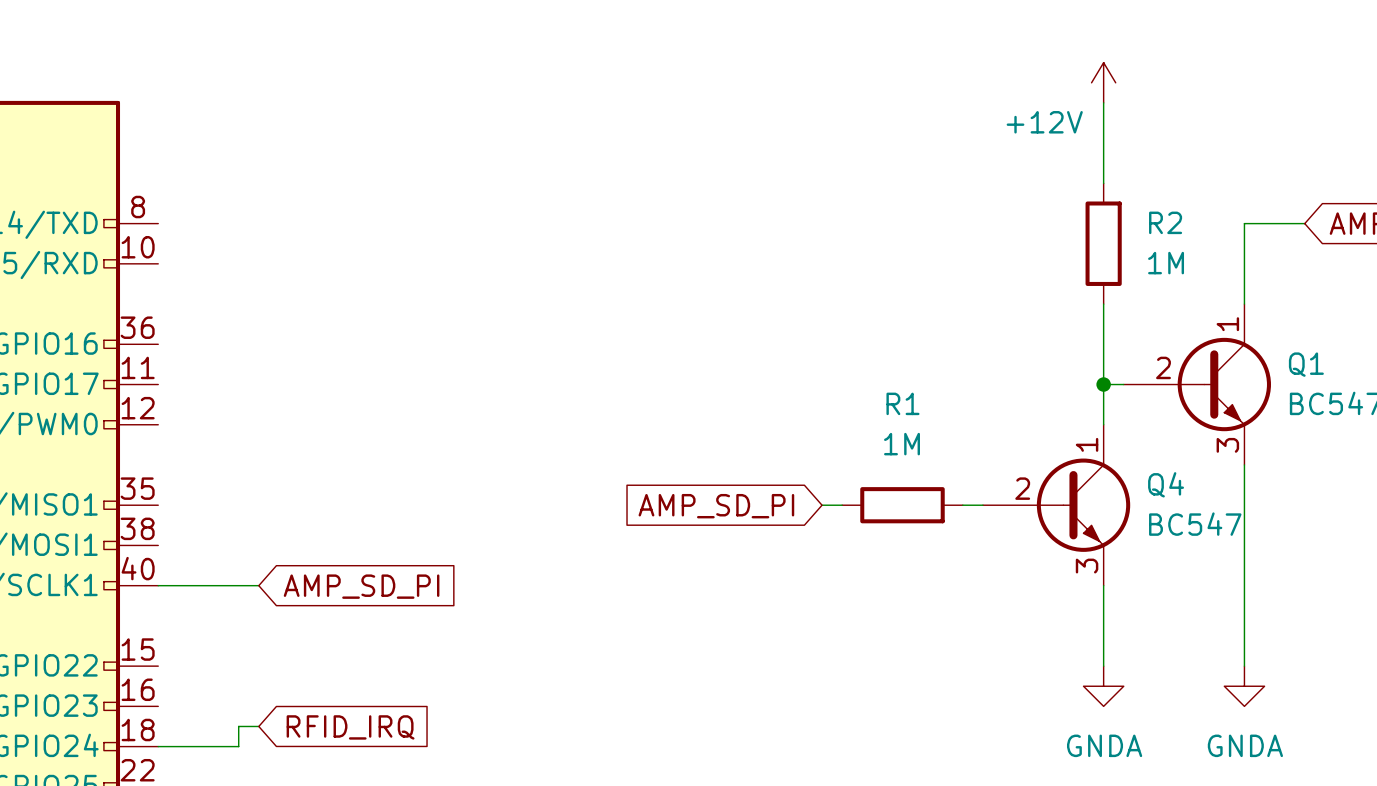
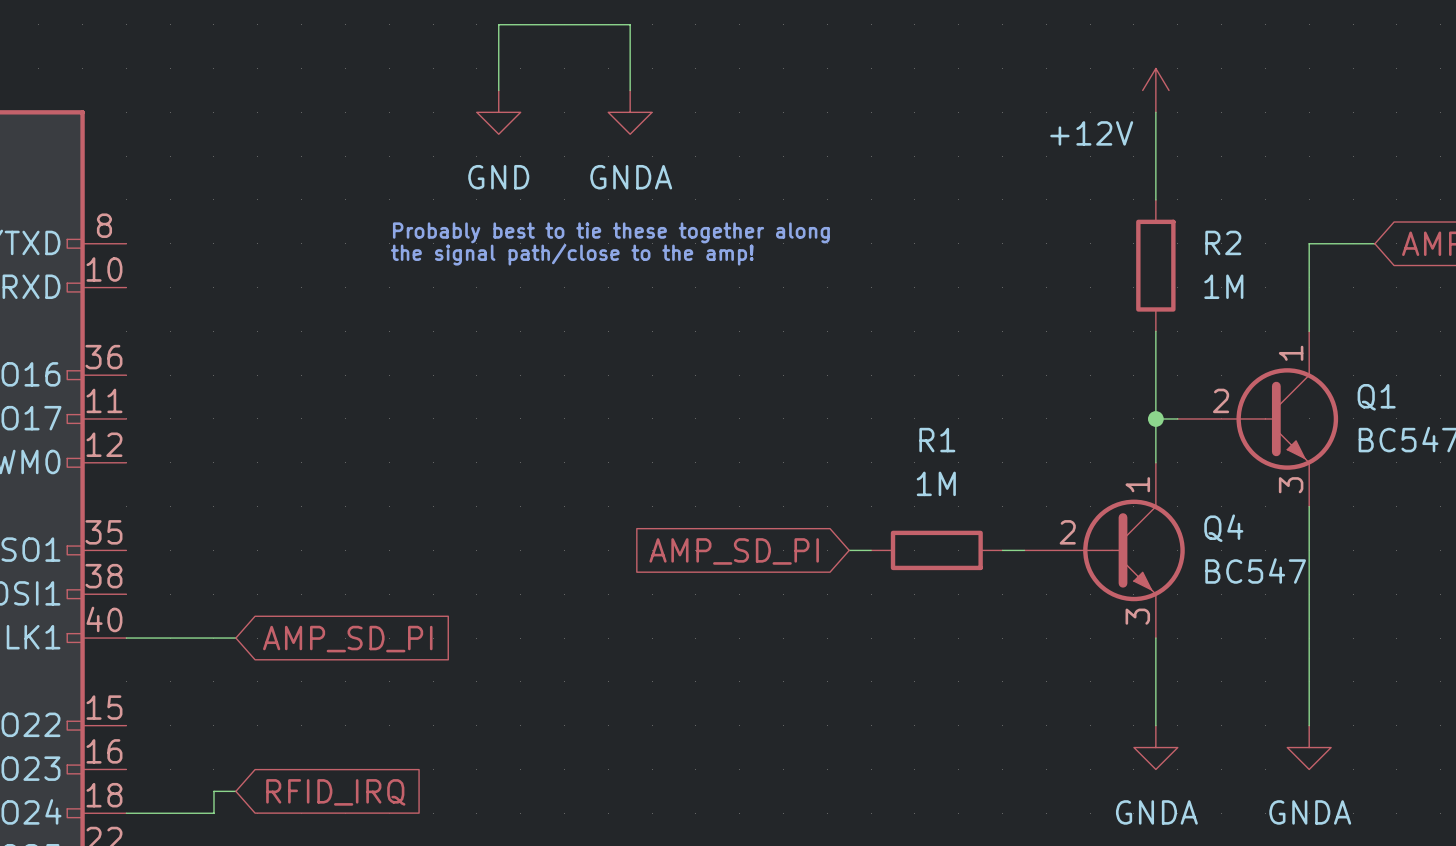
wire: none -> (498, 90) (498, 24) (630, 24) (630, 90)
power symbol: none -> GND (498, 112)
power symbol: none -> GNDA (630, 112)
text: none -> Probably best to tie these together along (611, 232)
text: none -> the signal path/close to the amp! (572, 254)

